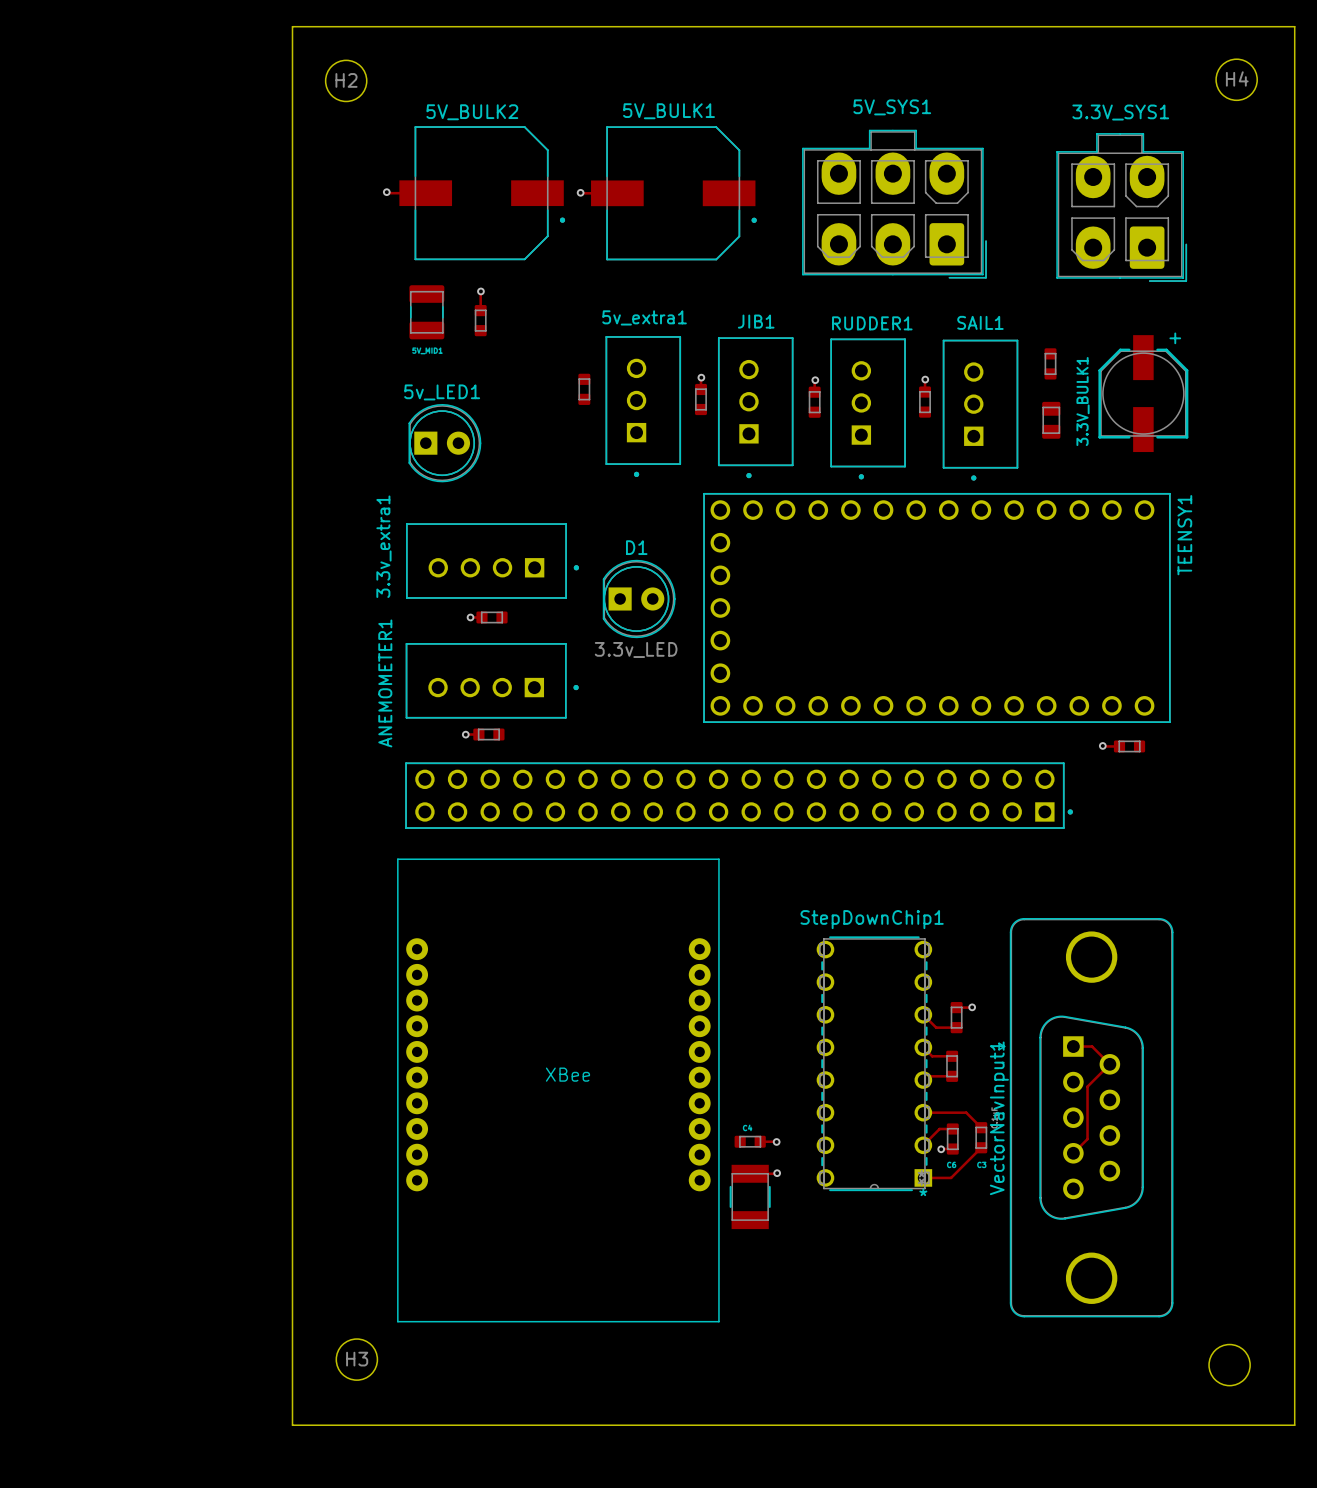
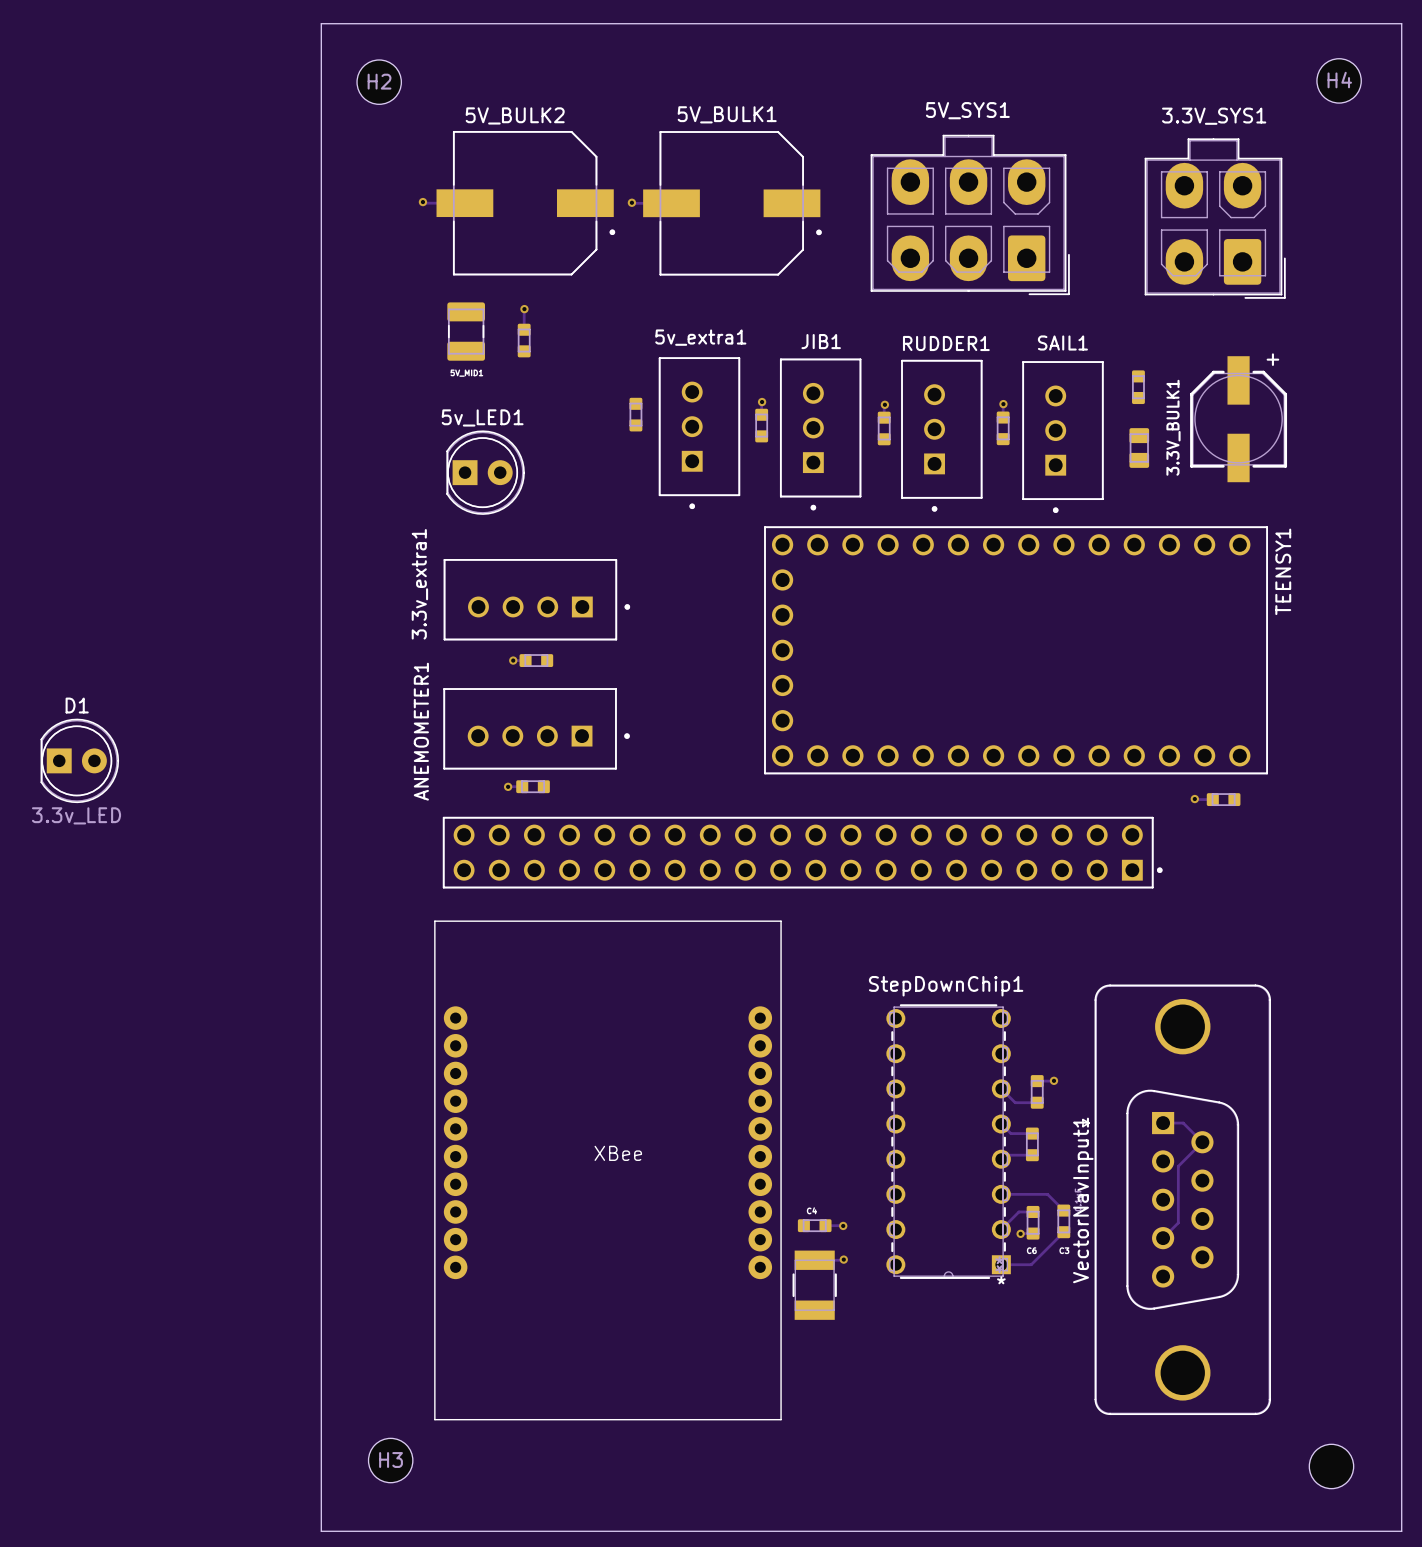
D1 position: (639, 598) -> (79, 760)

